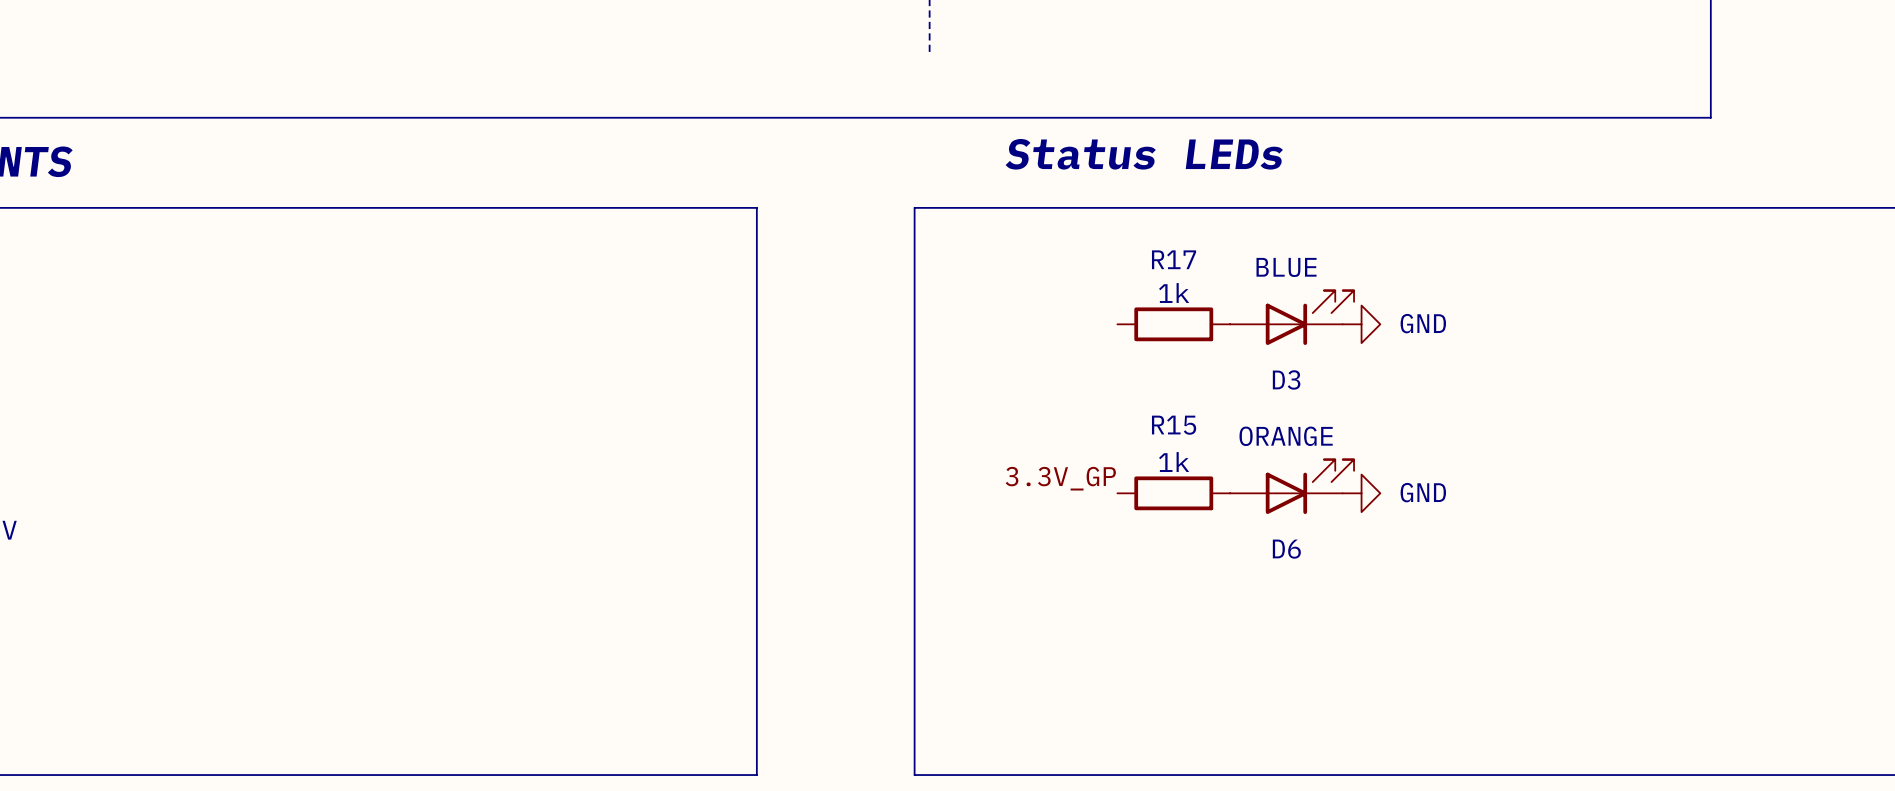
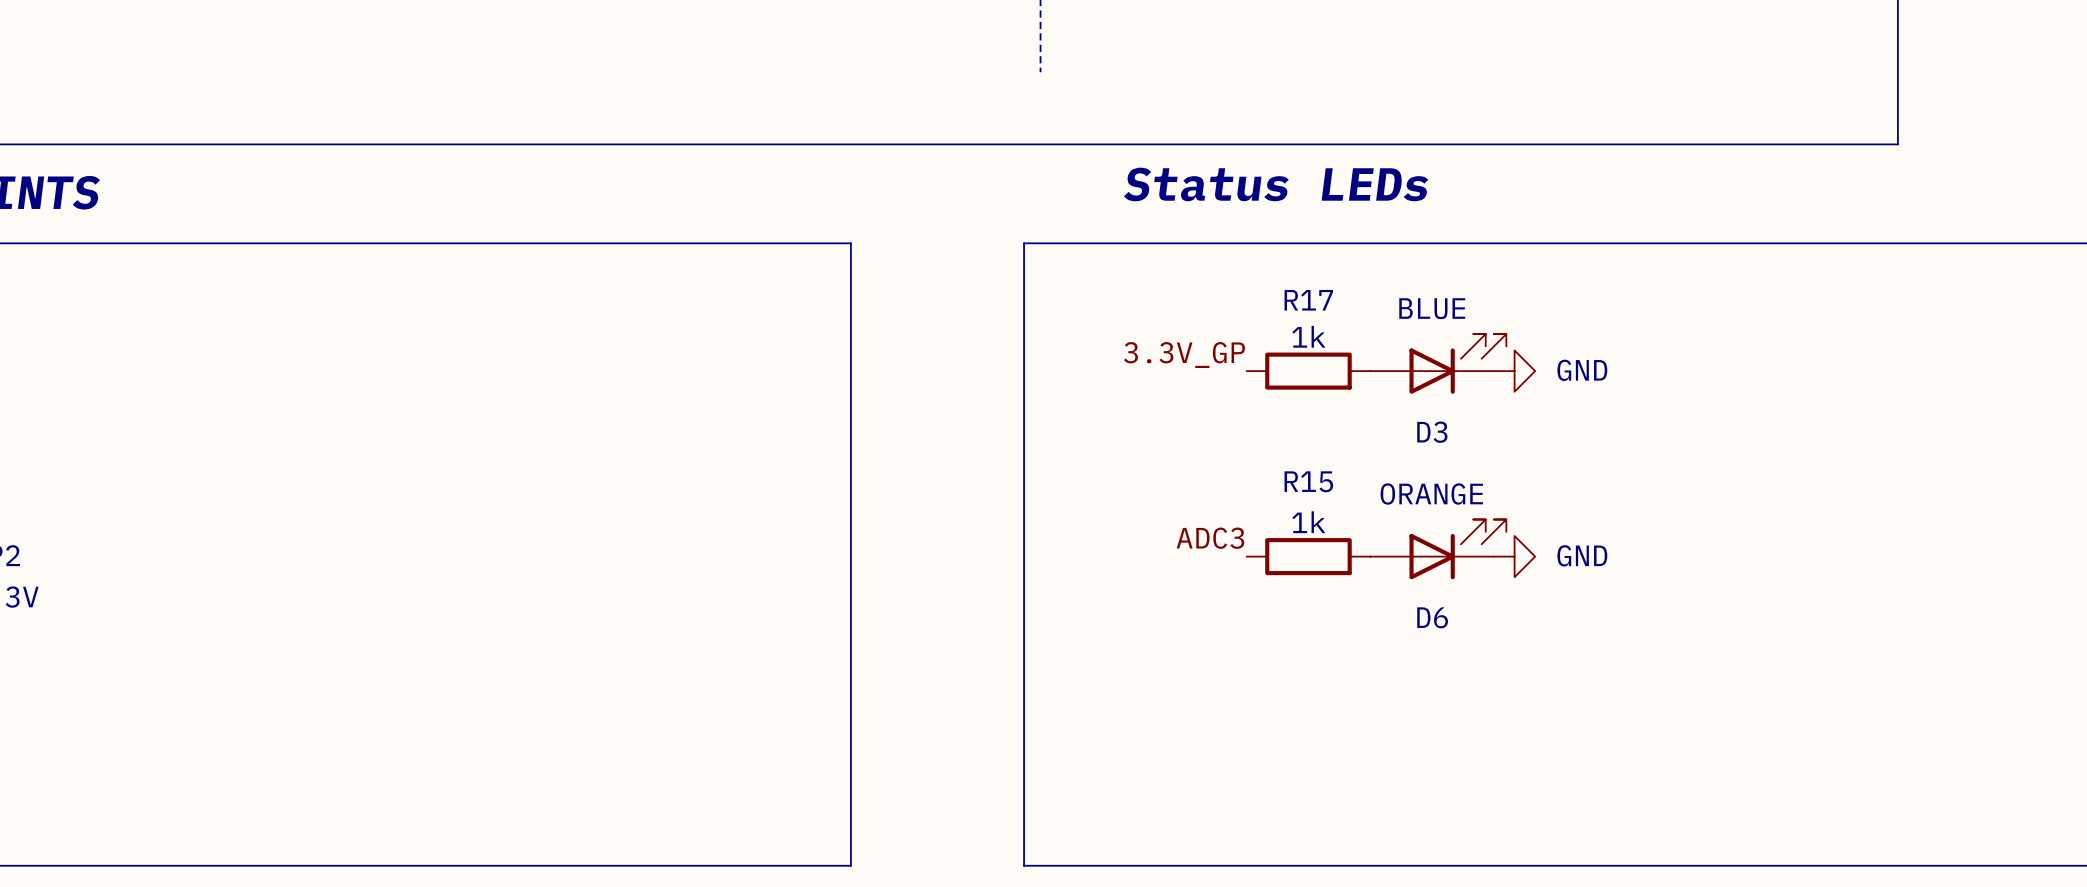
label: none -> 3.3V_GP (1184, 355)
label: 3.3V_GP (1060, 478) -> ADC3 (1210, 538)

